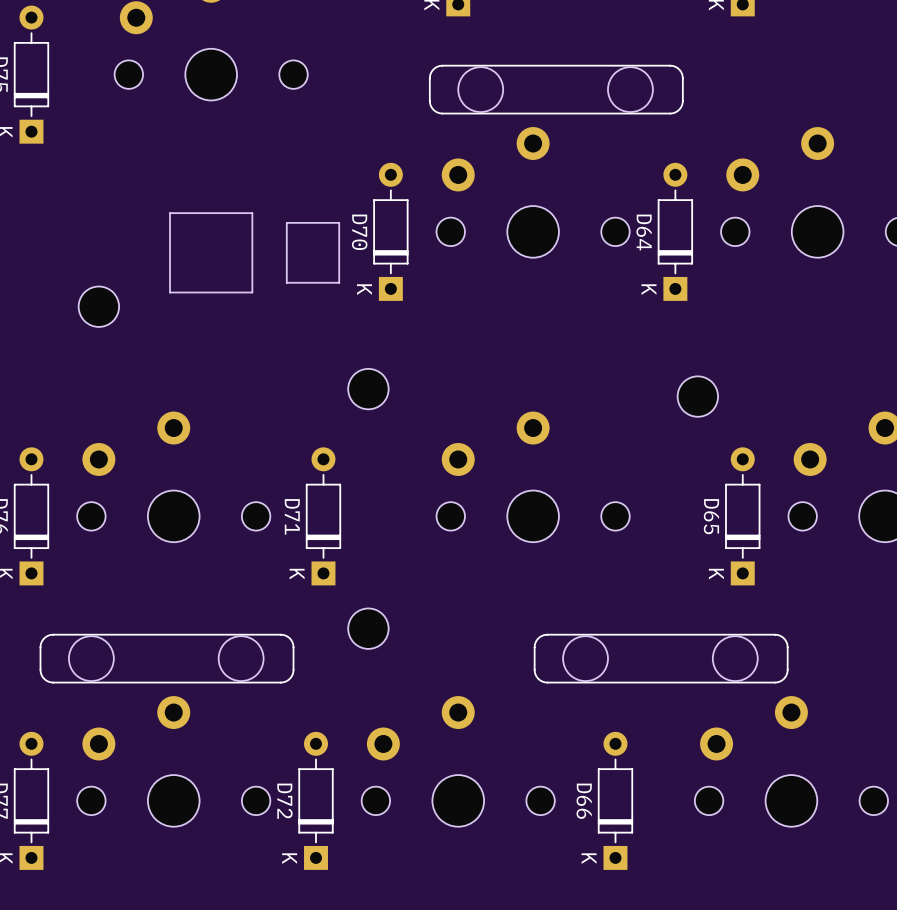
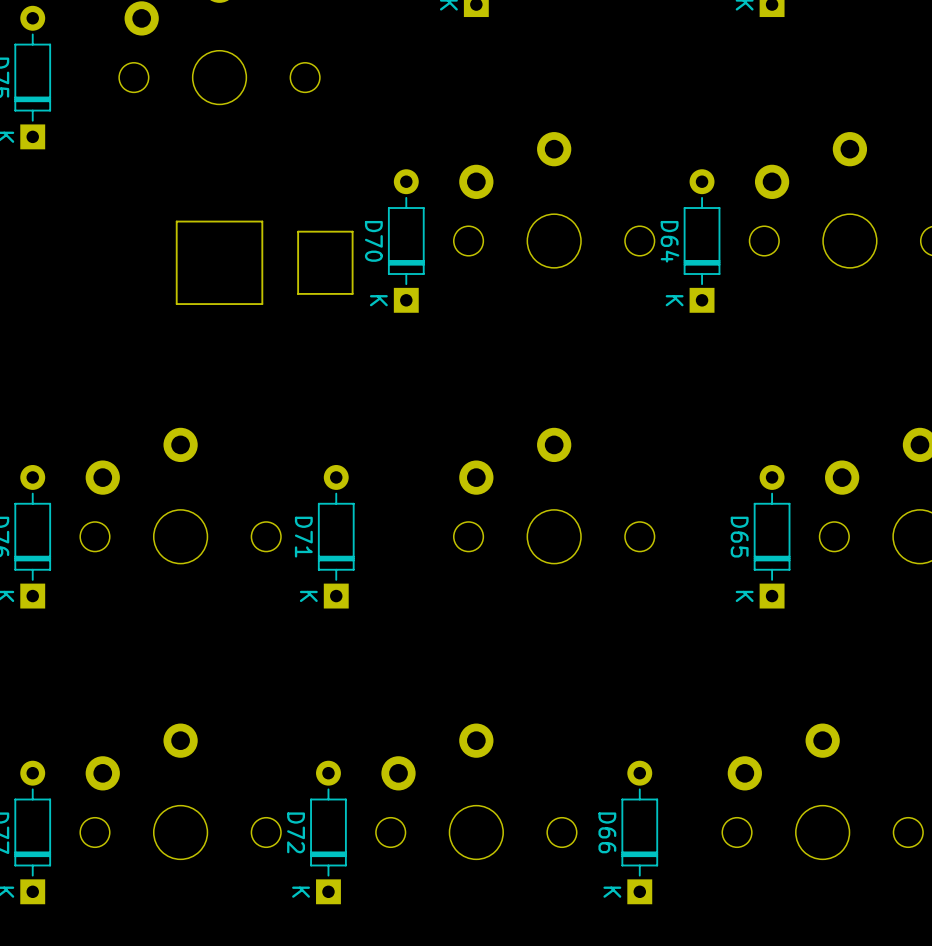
drawing: [429, 64, 684, 115] -> none
part: (98, 306) -> none
part: (368, 389) -> none
part: (697, 396) -> none
part: (368, 628) -> none
drawing: [39, 633, 295, 684] -> none
drawing: [533, 633, 789, 684] -> none

